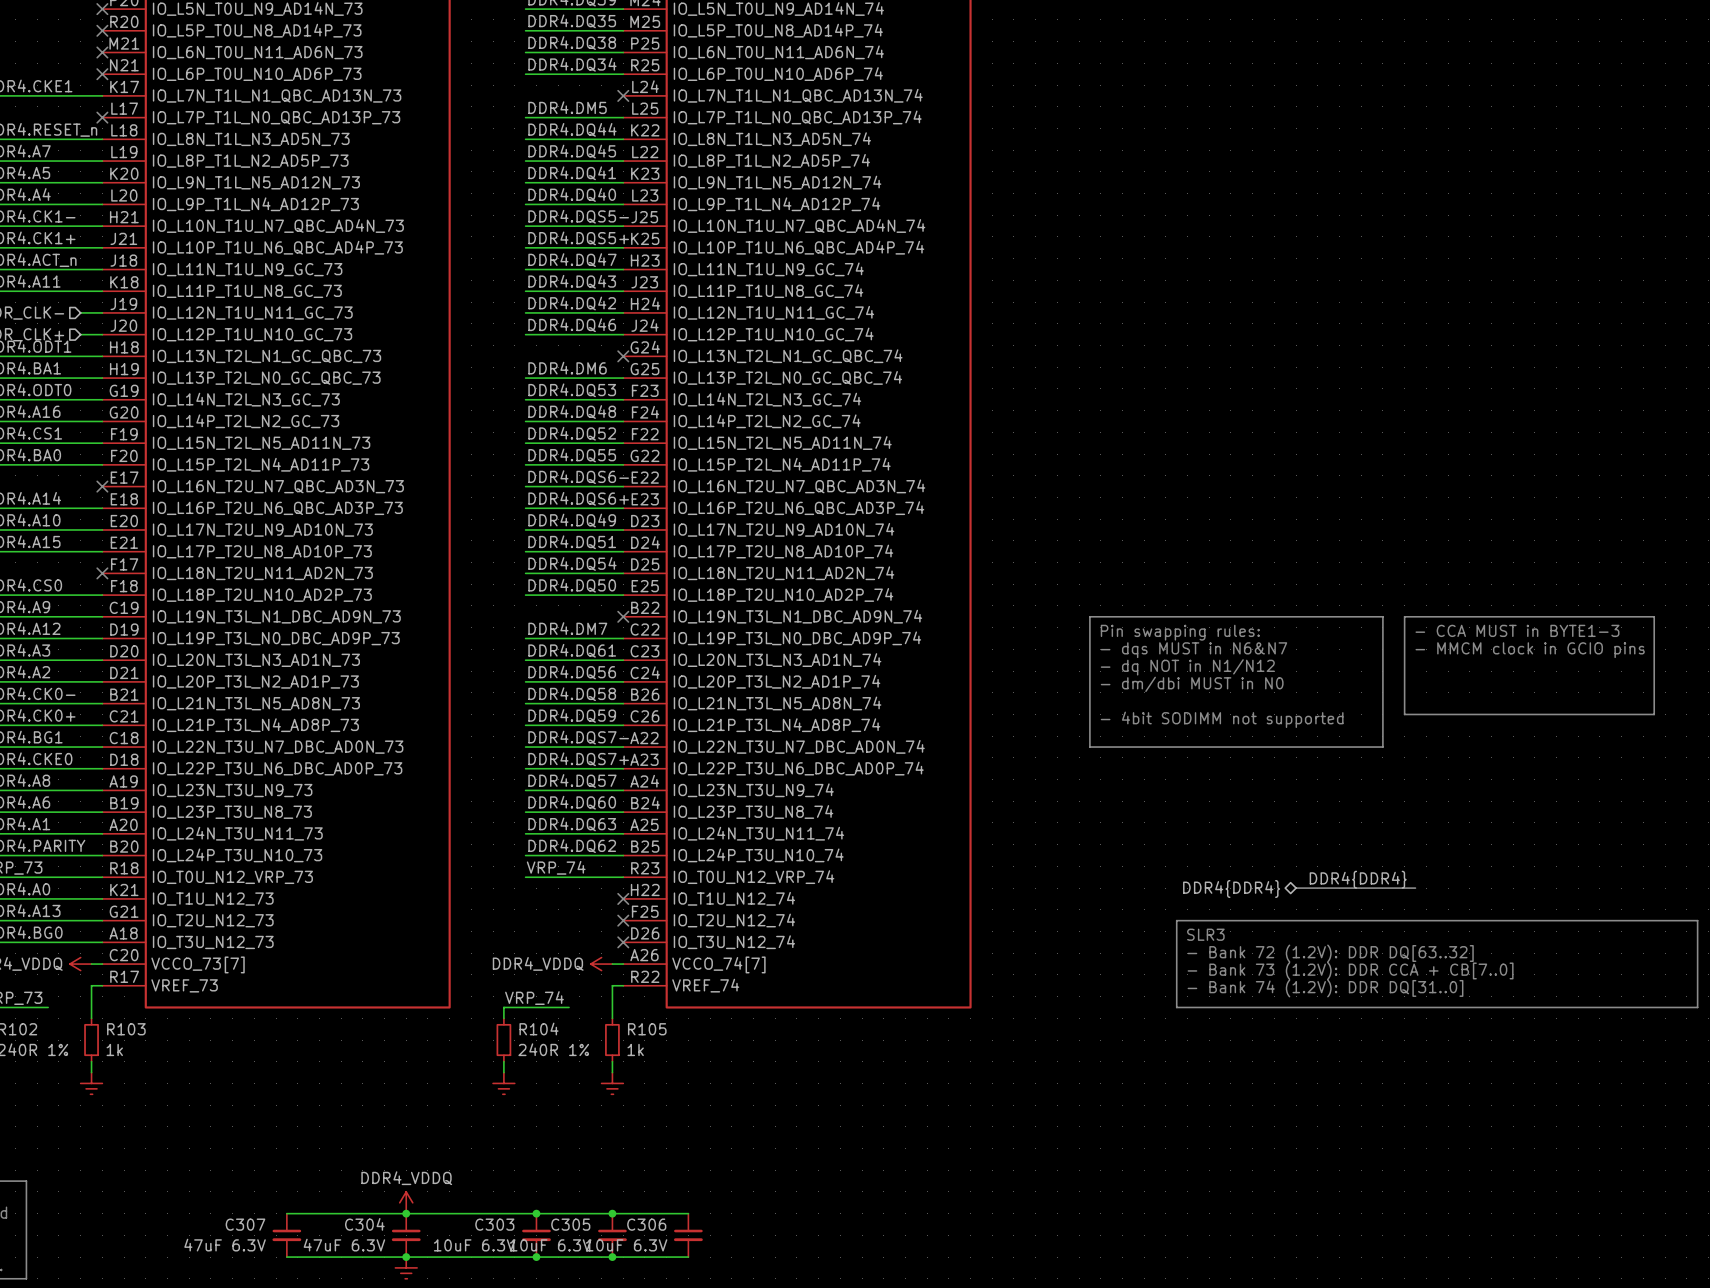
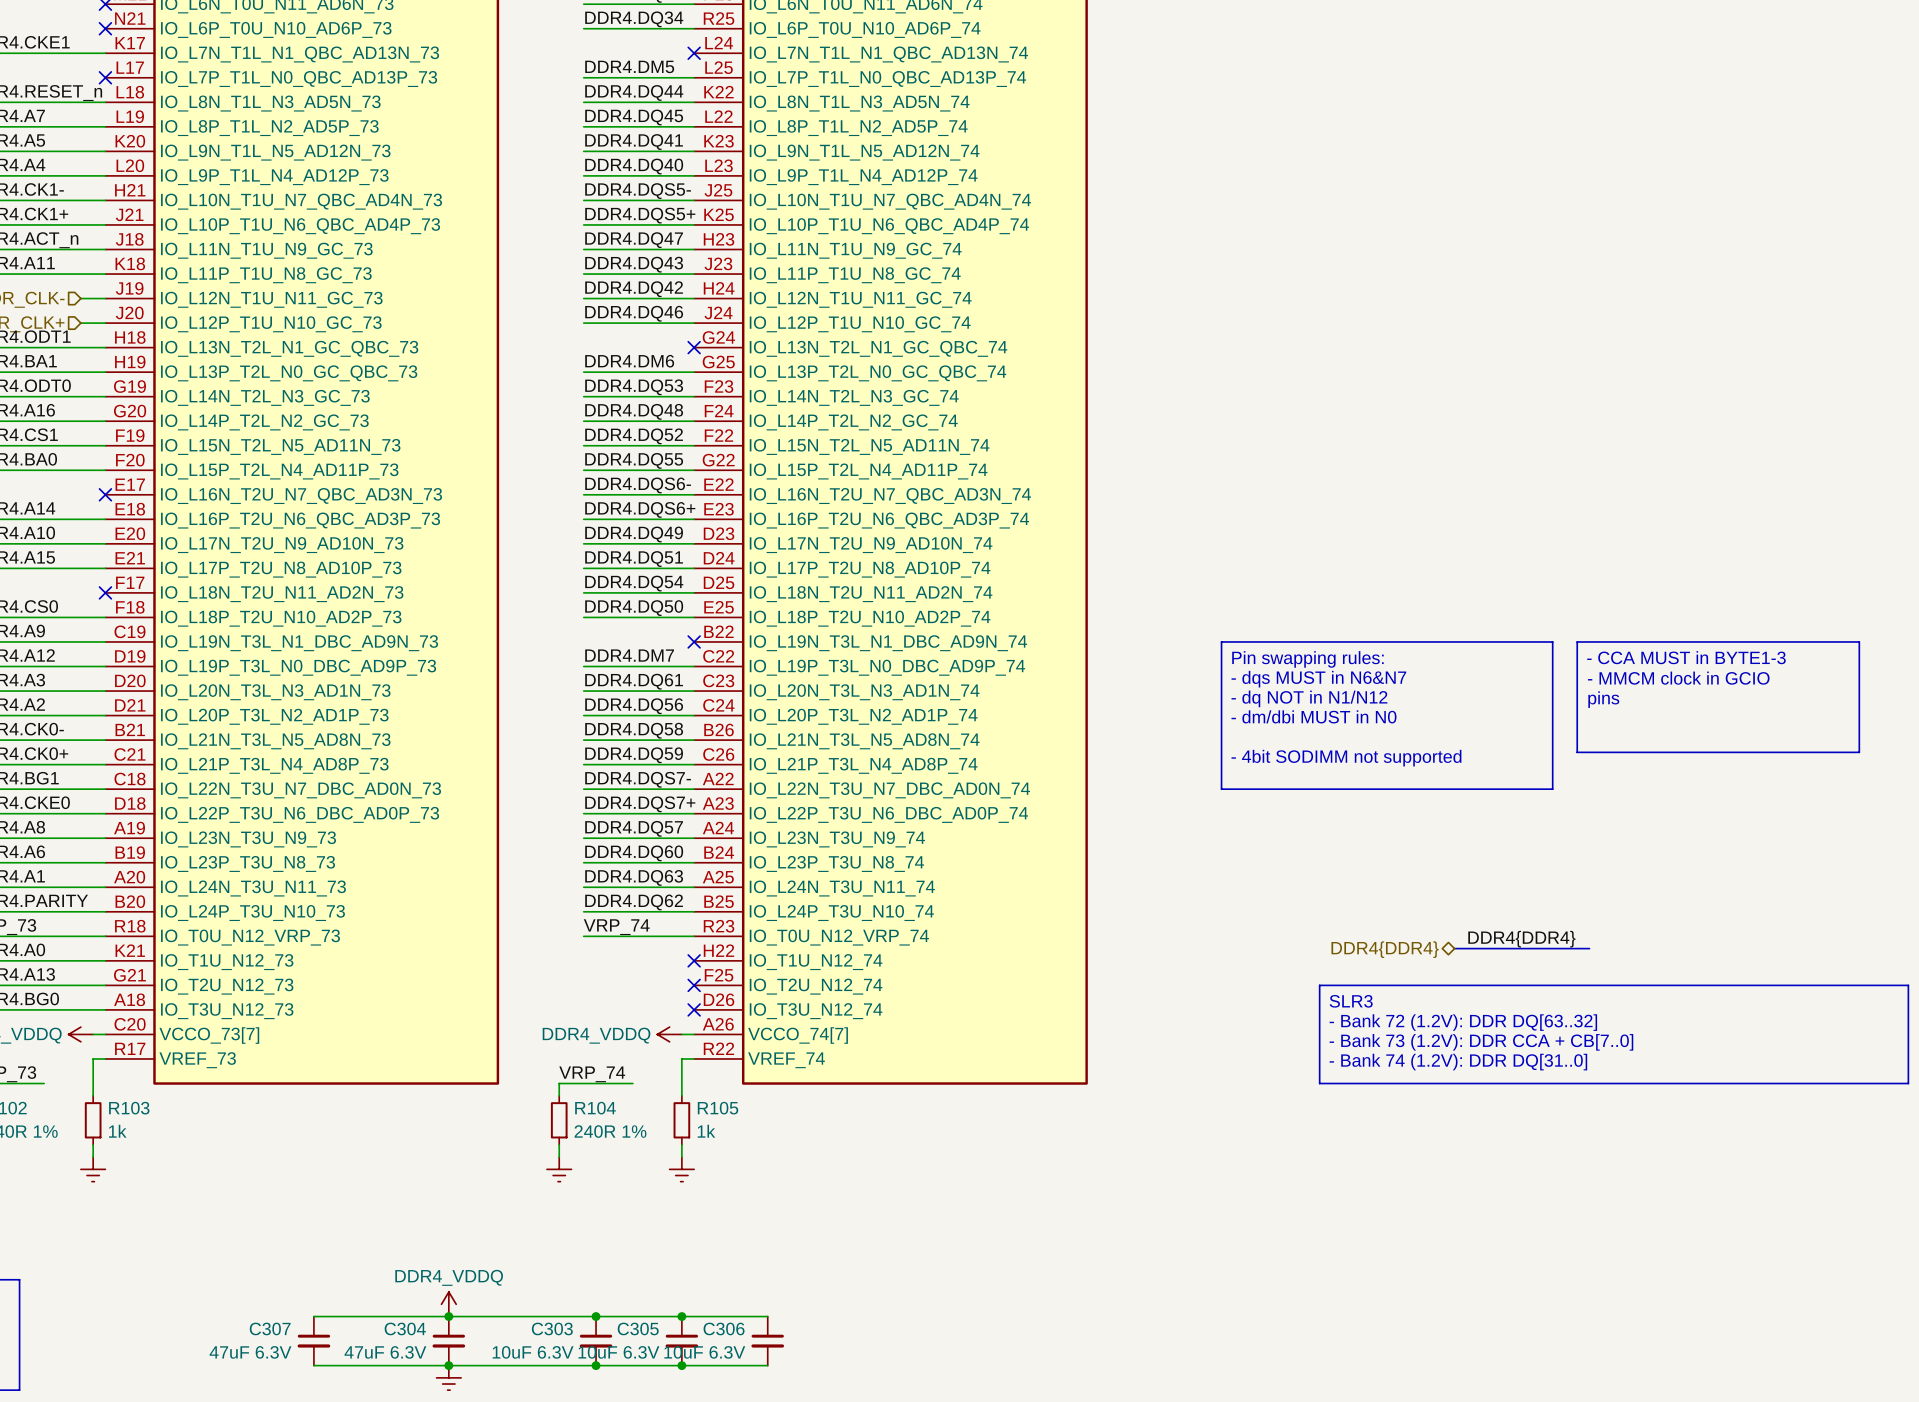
text: - MMCM clock in GCIO pins (1530, 650) -> - MMCM clock in GCIO (1678, 678)
text: none -> pins (1603, 699)

